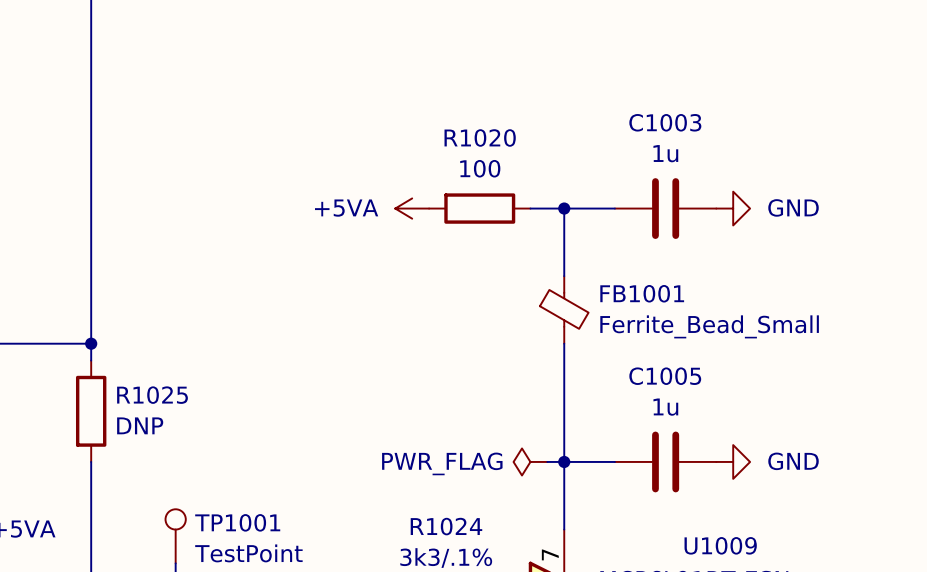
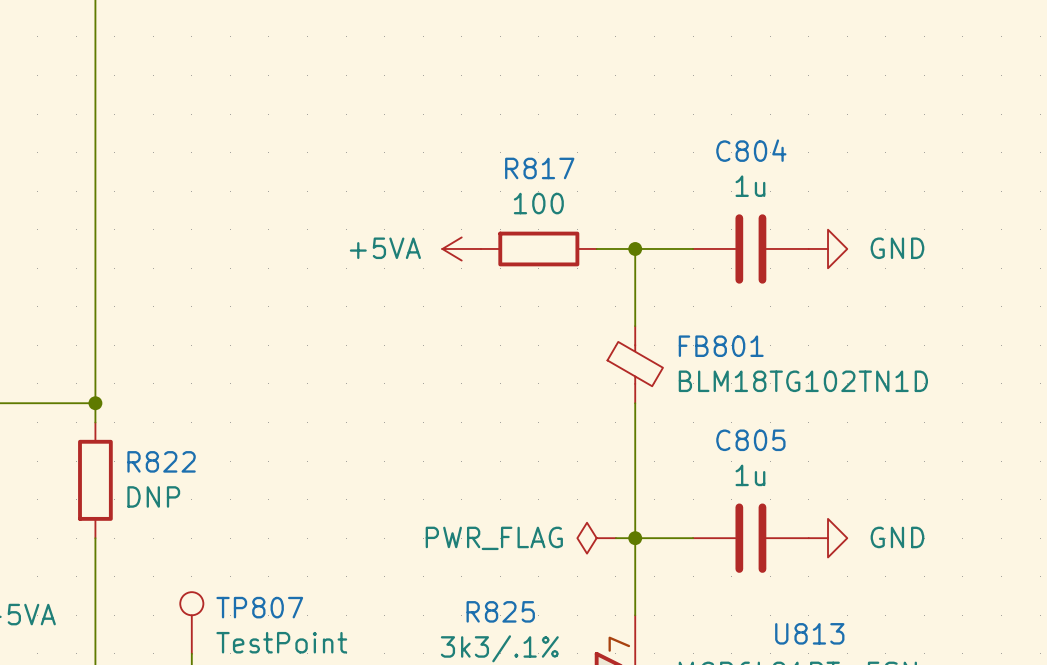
C1003 name: C1003 (665, 122) -> C804 (751, 150)
R1020 name: R1020 (480, 137) -> R817 (539, 168)
FB1001 name: FB1001 (642, 293) -> FB801 (721, 346)
FB1001 value: Ferrite_Bead_Small (709, 326) -> BLM18TG102TN1D (803, 381)
C1005 name: C1005 (665, 376) -> C805 (750, 440)
R1025 name: R1025 (152, 395) -> R822 (161, 461)
TP1001 name: TP1001 (237, 522) -> TP807 (259, 607)
R1024 name: R1024 (446, 526) -> R825 (500, 611)
U1009 name: U1009 (720, 545) -> U813 (809, 633)

